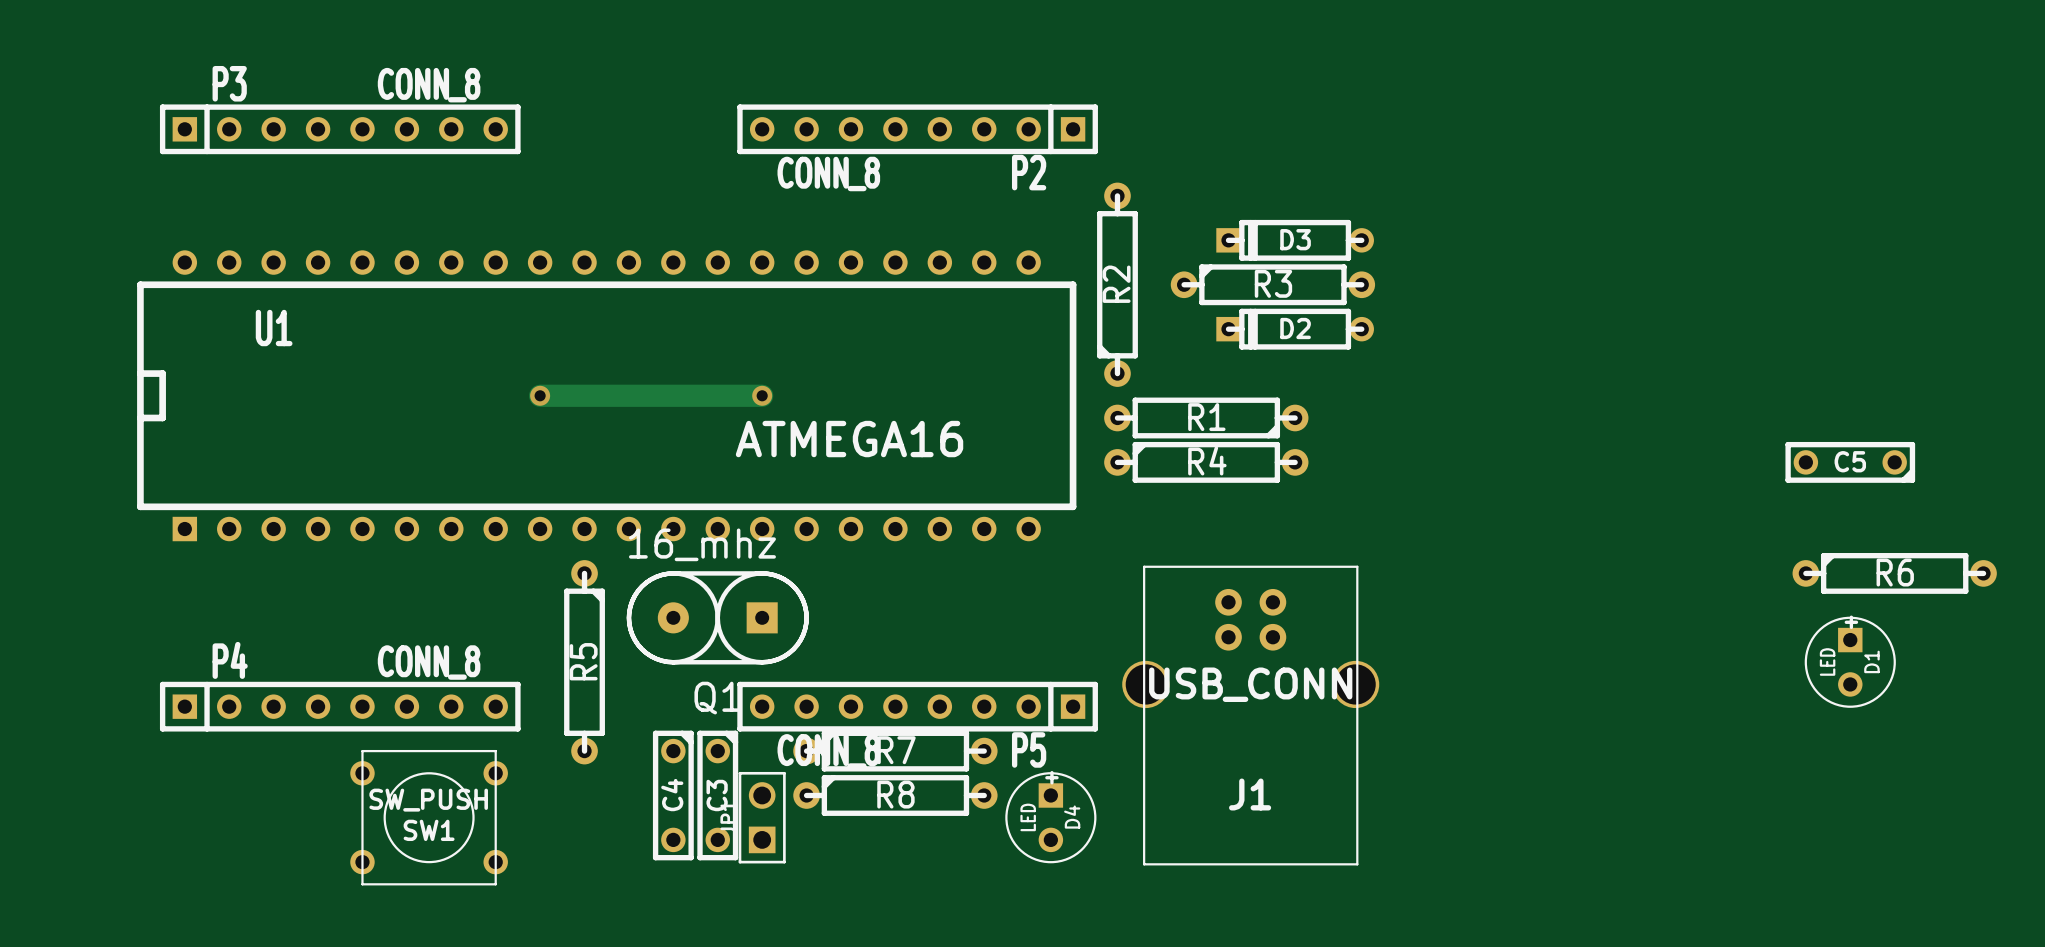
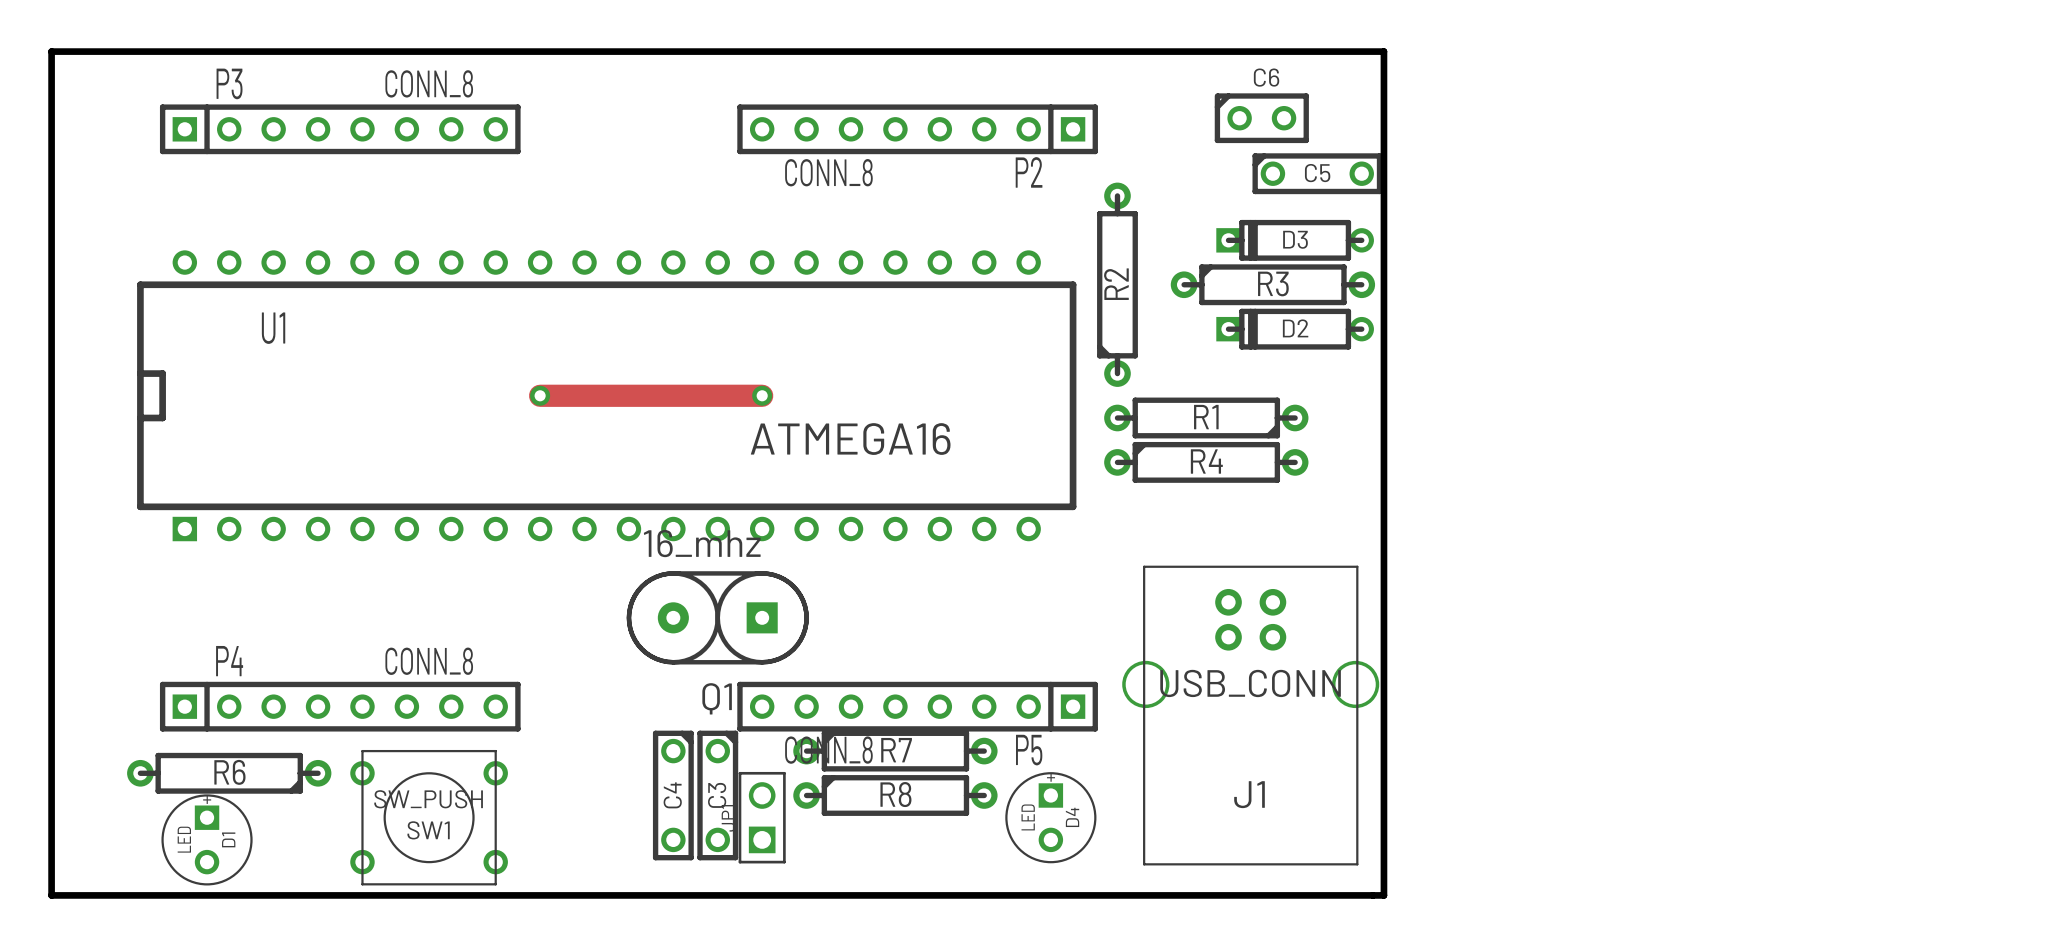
board edge: none -> (51, 51) (51, 895) (1383, 895) (1383, 51) (51, 51)
C6: none -> (1261, 118)
C5 rotation: 0° (1850, 462) -> 180° (1317, 173)
C5 position: (1850, 462) -> (1317, 173)
R6 rotation: 0° (1894, 573) -> 180° (229, 773)
R6 position: (1894, 573) -> (229, 773)
R5: (584, 662) -> none
D1 position: (1850, 662) -> (207, 839)

